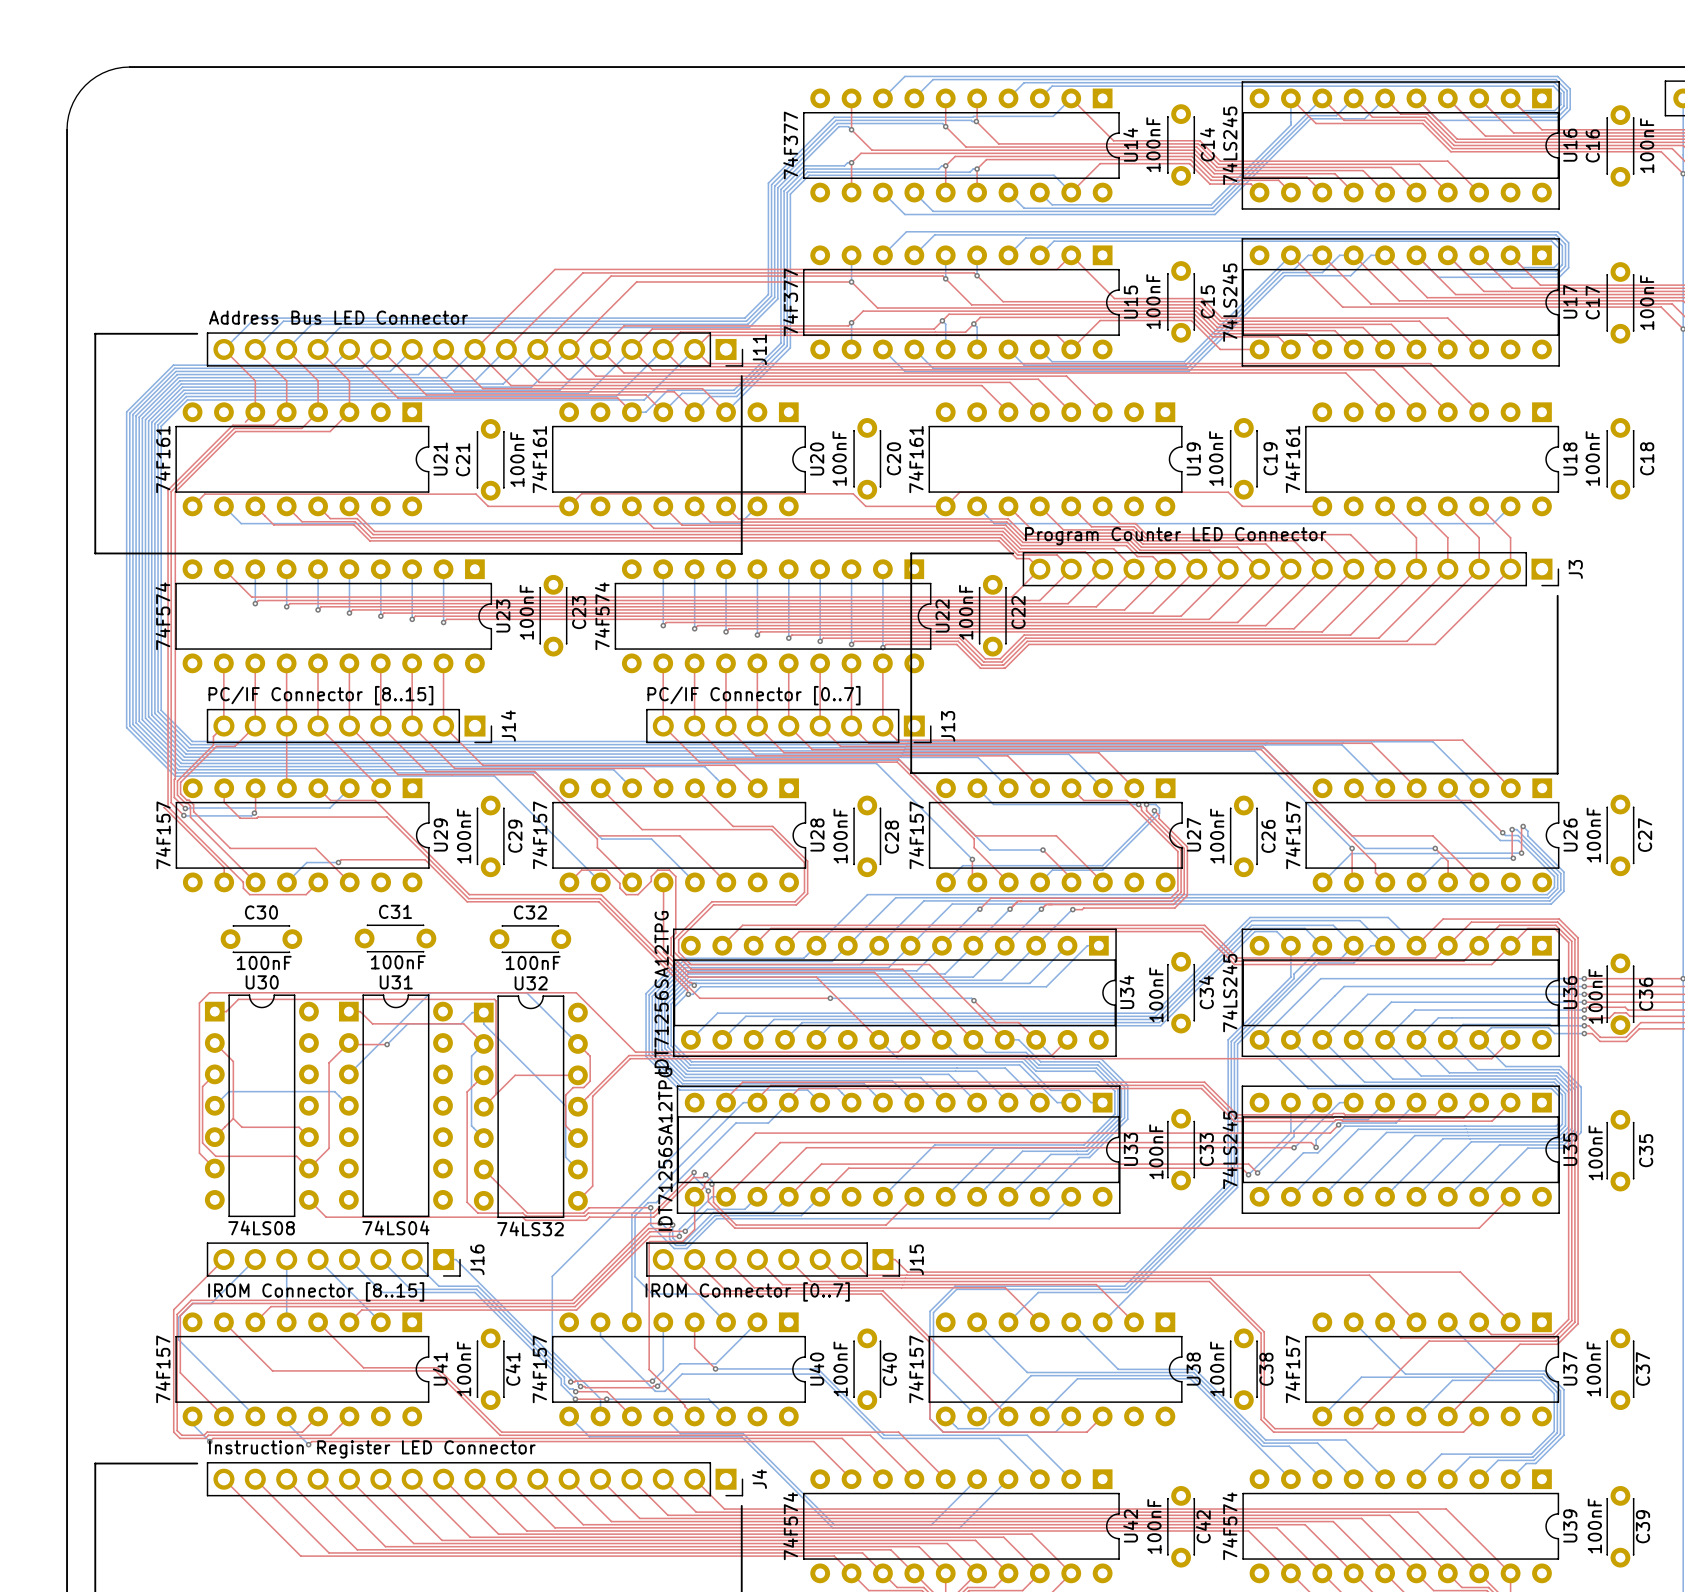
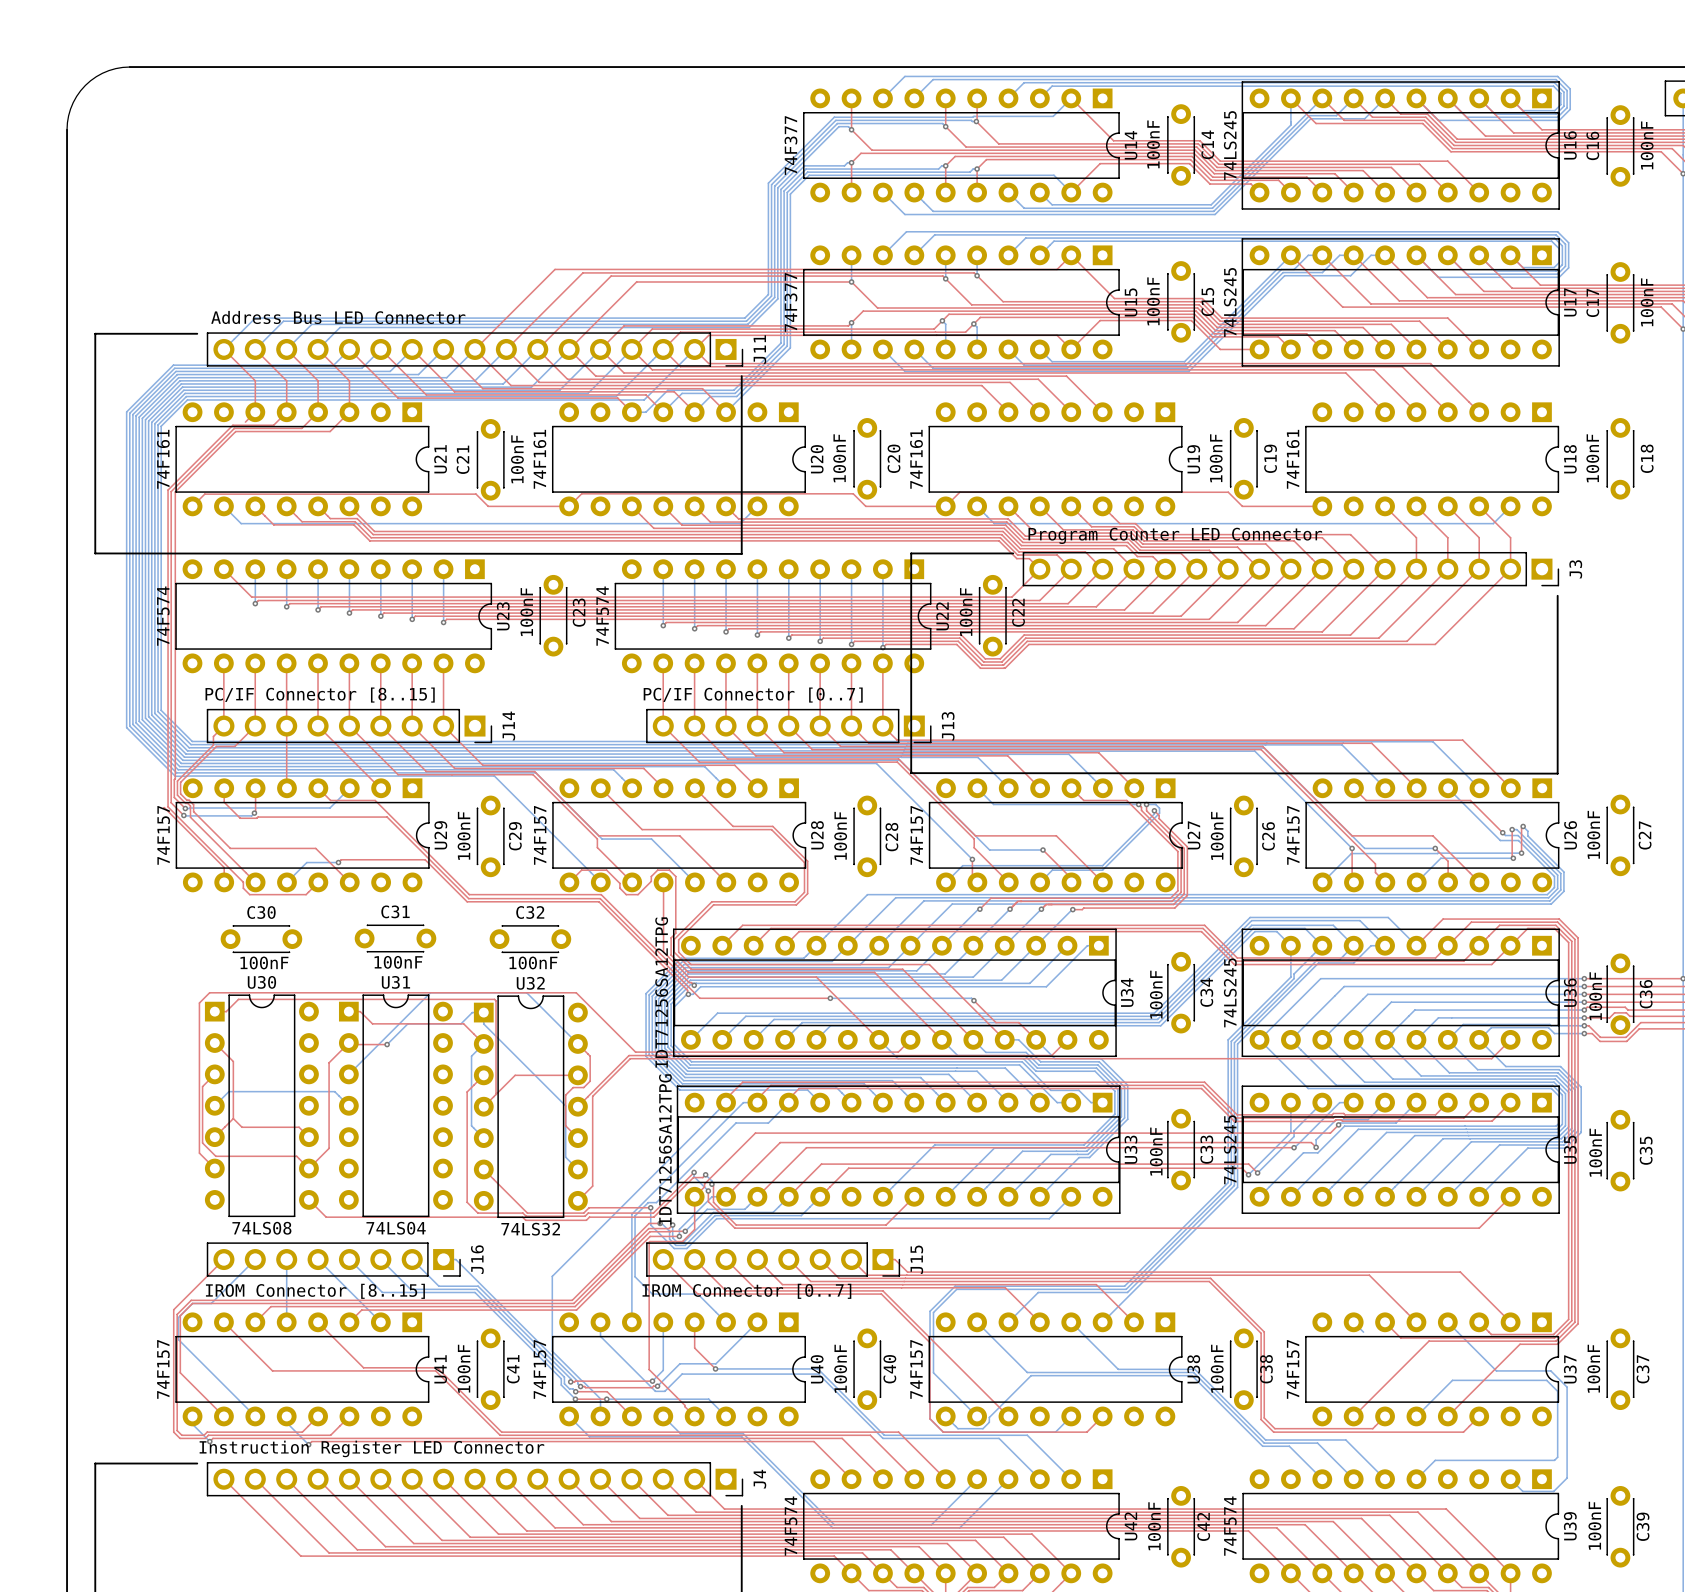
bottom track: (1363, 1332) (1405, 1374) (1543, 1374) (1560, 1390) (1560, 1434) (1534, 1460) -> none
bottom track: (1545, 1370) (1563, 1389) (1563, 1435) (1535, 1463) (1526, 1463) (1510, 1479) -> (1545, 1370) (1550, 1370) (1567, 1387) (1567, 1478) (1553, 1491) (1522, 1491) (1510, 1479)
bottom track: (1540, 1380) (1554, 1393) (1554, 1431) (1531, 1454) (1441, 1454) (1435, 1460) -> (1540, 1380) (1546, 1380) (1557, 1391) (1557, 1457) (1554, 1460) (1534, 1460)
bottom track: (1039, 1416) (1077, 1378) (1190, 1378) (1290, 1479) -> none
bottom track: (1322, 1416) (1361, 1377) (1542, 1377) (1557, 1392) (1557, 1432) (1532, 1457) (1469, 1457) (1447, 1479) -> none
bottom track: (1498, 1460) (1479, 1479) -> (1498, 1460) (1435, 1460)

